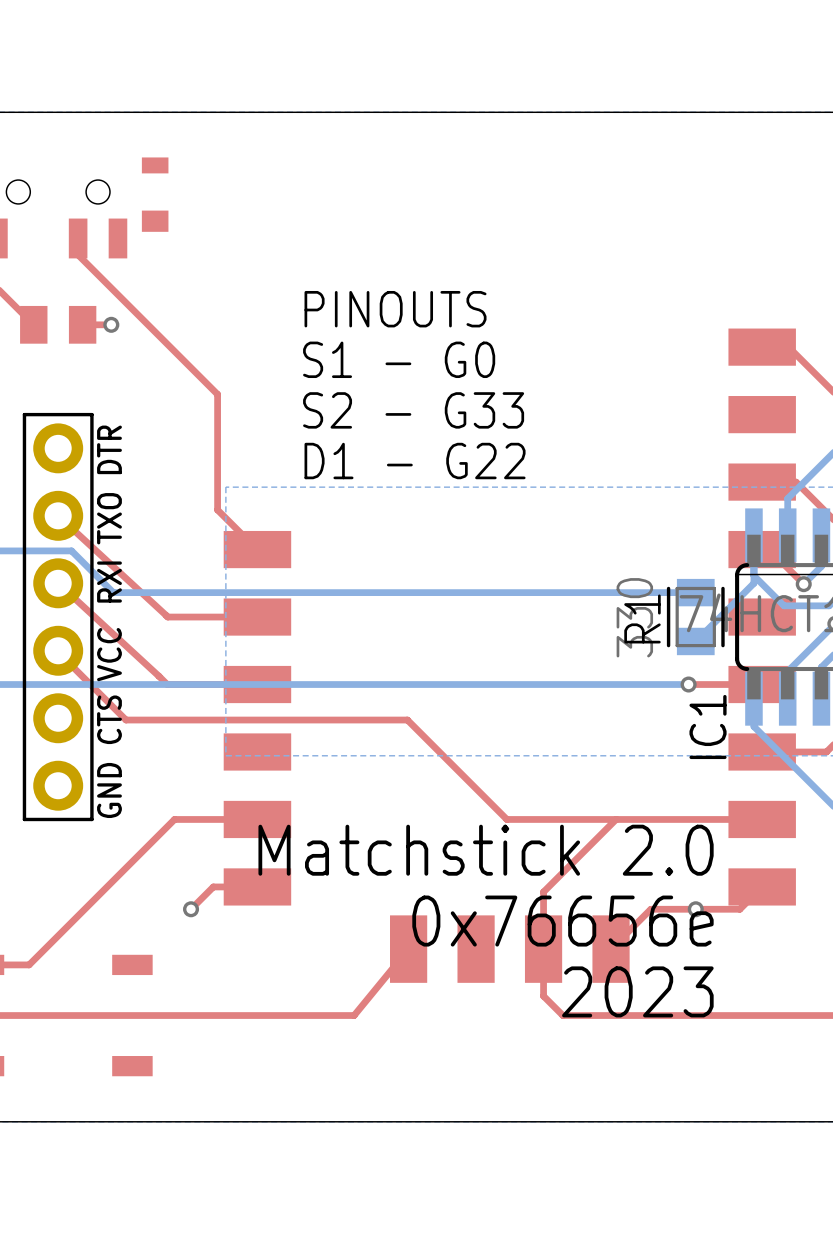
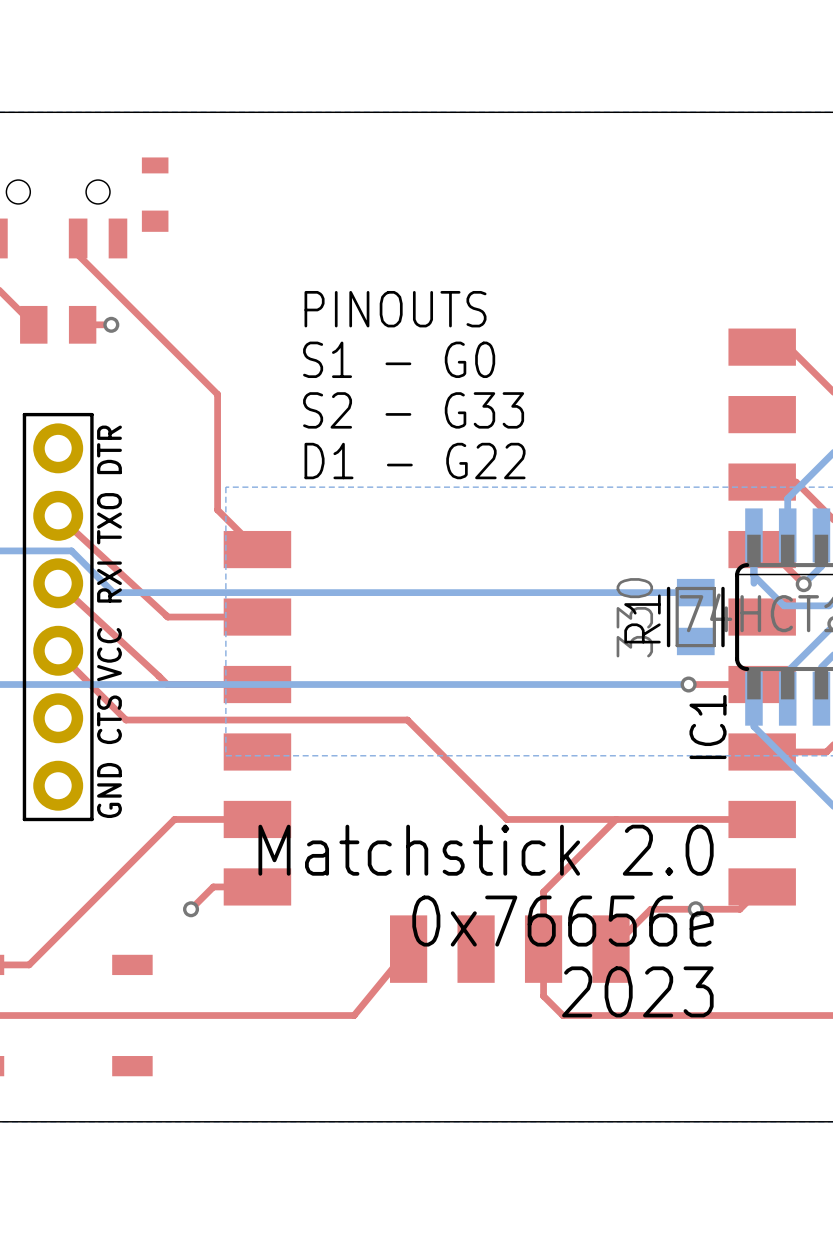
bottom track: (753, 583) (695, 641) -> none

